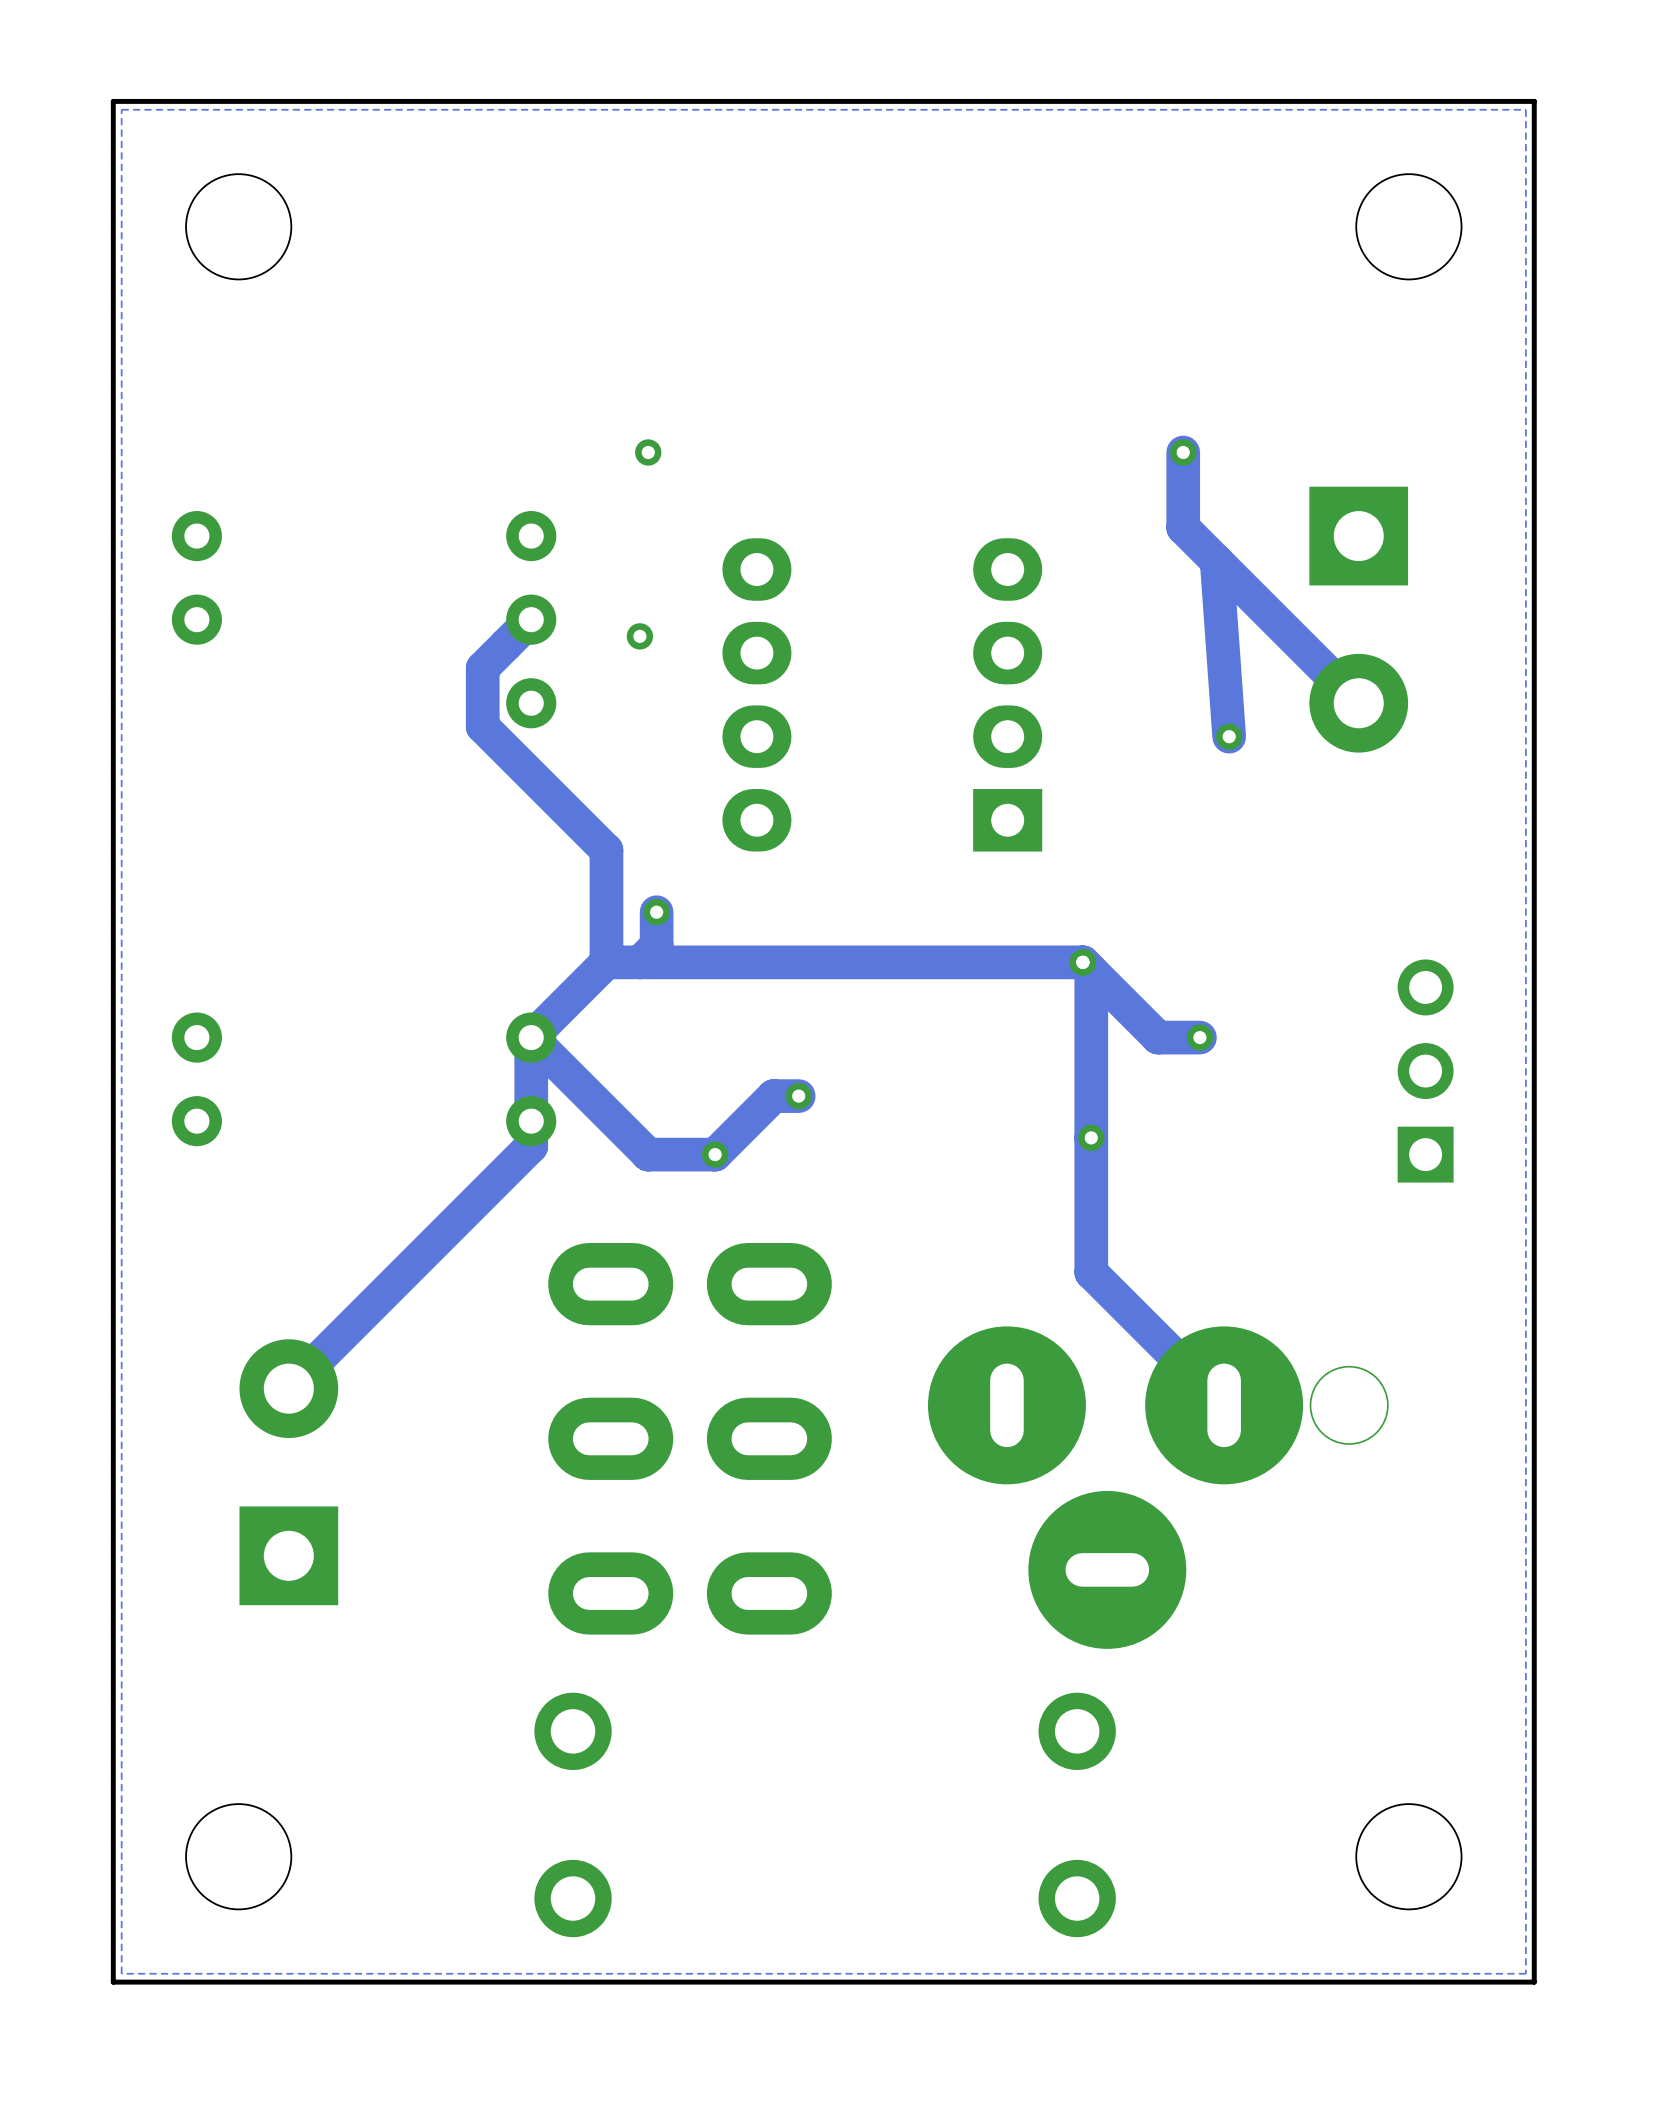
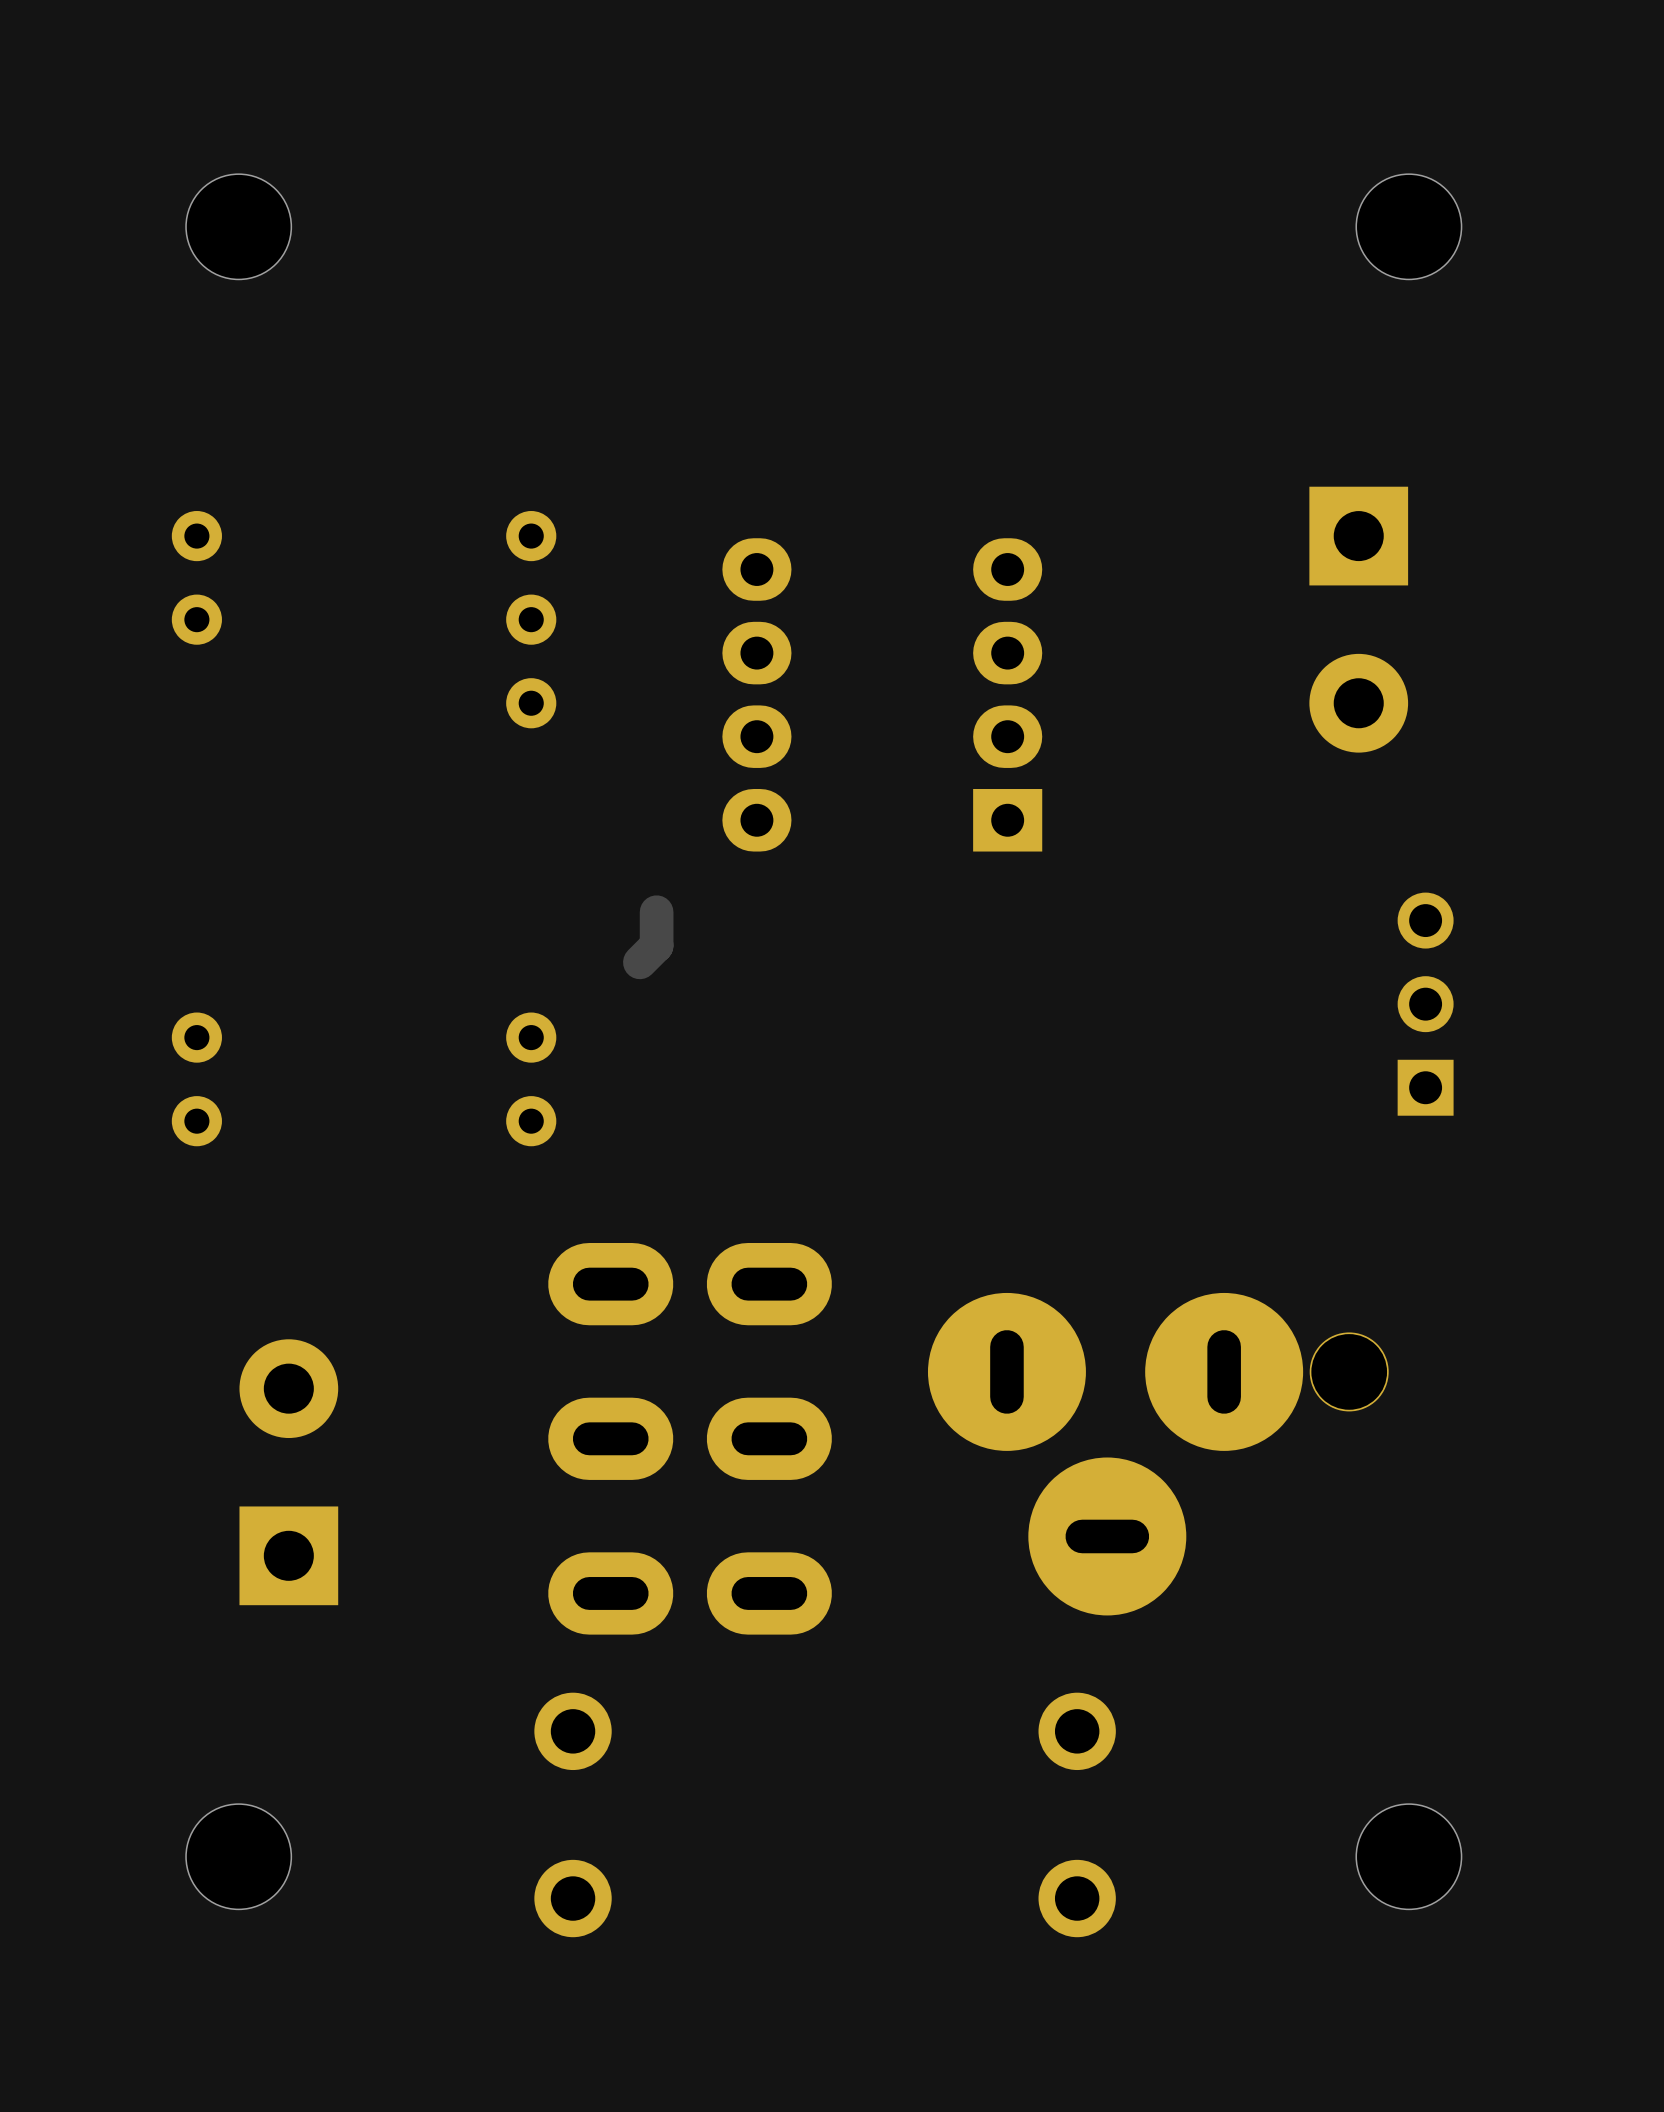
board edge: (1534, 101) (1534, 1982) (113, 1982) (113, 101) (1534, 101) -> none
zone outline: (1525, 109) (121, 109) (121, 1973) (1525, 1973) (1525, 109) -> none
via: (648, 452) -> none
track: (1183, 452) (1183, 527) (1358, 703) -> none
via: (1183, 452) -> none
track: (1216, 561) (1229, 736) -> none
track: (531, 619) (482, 668) (482, 726) (606, 850) (606, 962) -> none
via: (639, 636) -> none
via: (1229, 736) -> none
via: (656, 912) -> none
track: (606, 962) (531, 1037) -> none
track: (606, 962) (1082, 962) (1158, 1037) (1199, 1037) -> none
via: (1082, 962) -> none
track: (1091, 970) (1091, 1272) (1224, 1405) -> none
track: (531, 1037) (648, 1154) (715, 1154) (773, 1096) (798, 1096) -> none
track: (531, 1037) (531, 1146) (288, 1388) -> none
via: (1199, 1037) -> none
part position: (1425, 1071) -> (1425, 1004)
via: (798, 1096) -> none
via: (1091, 1137) -> none
via: (715, 1154) -> none
part position: (1158, 1487) -> (1158, 1454)

